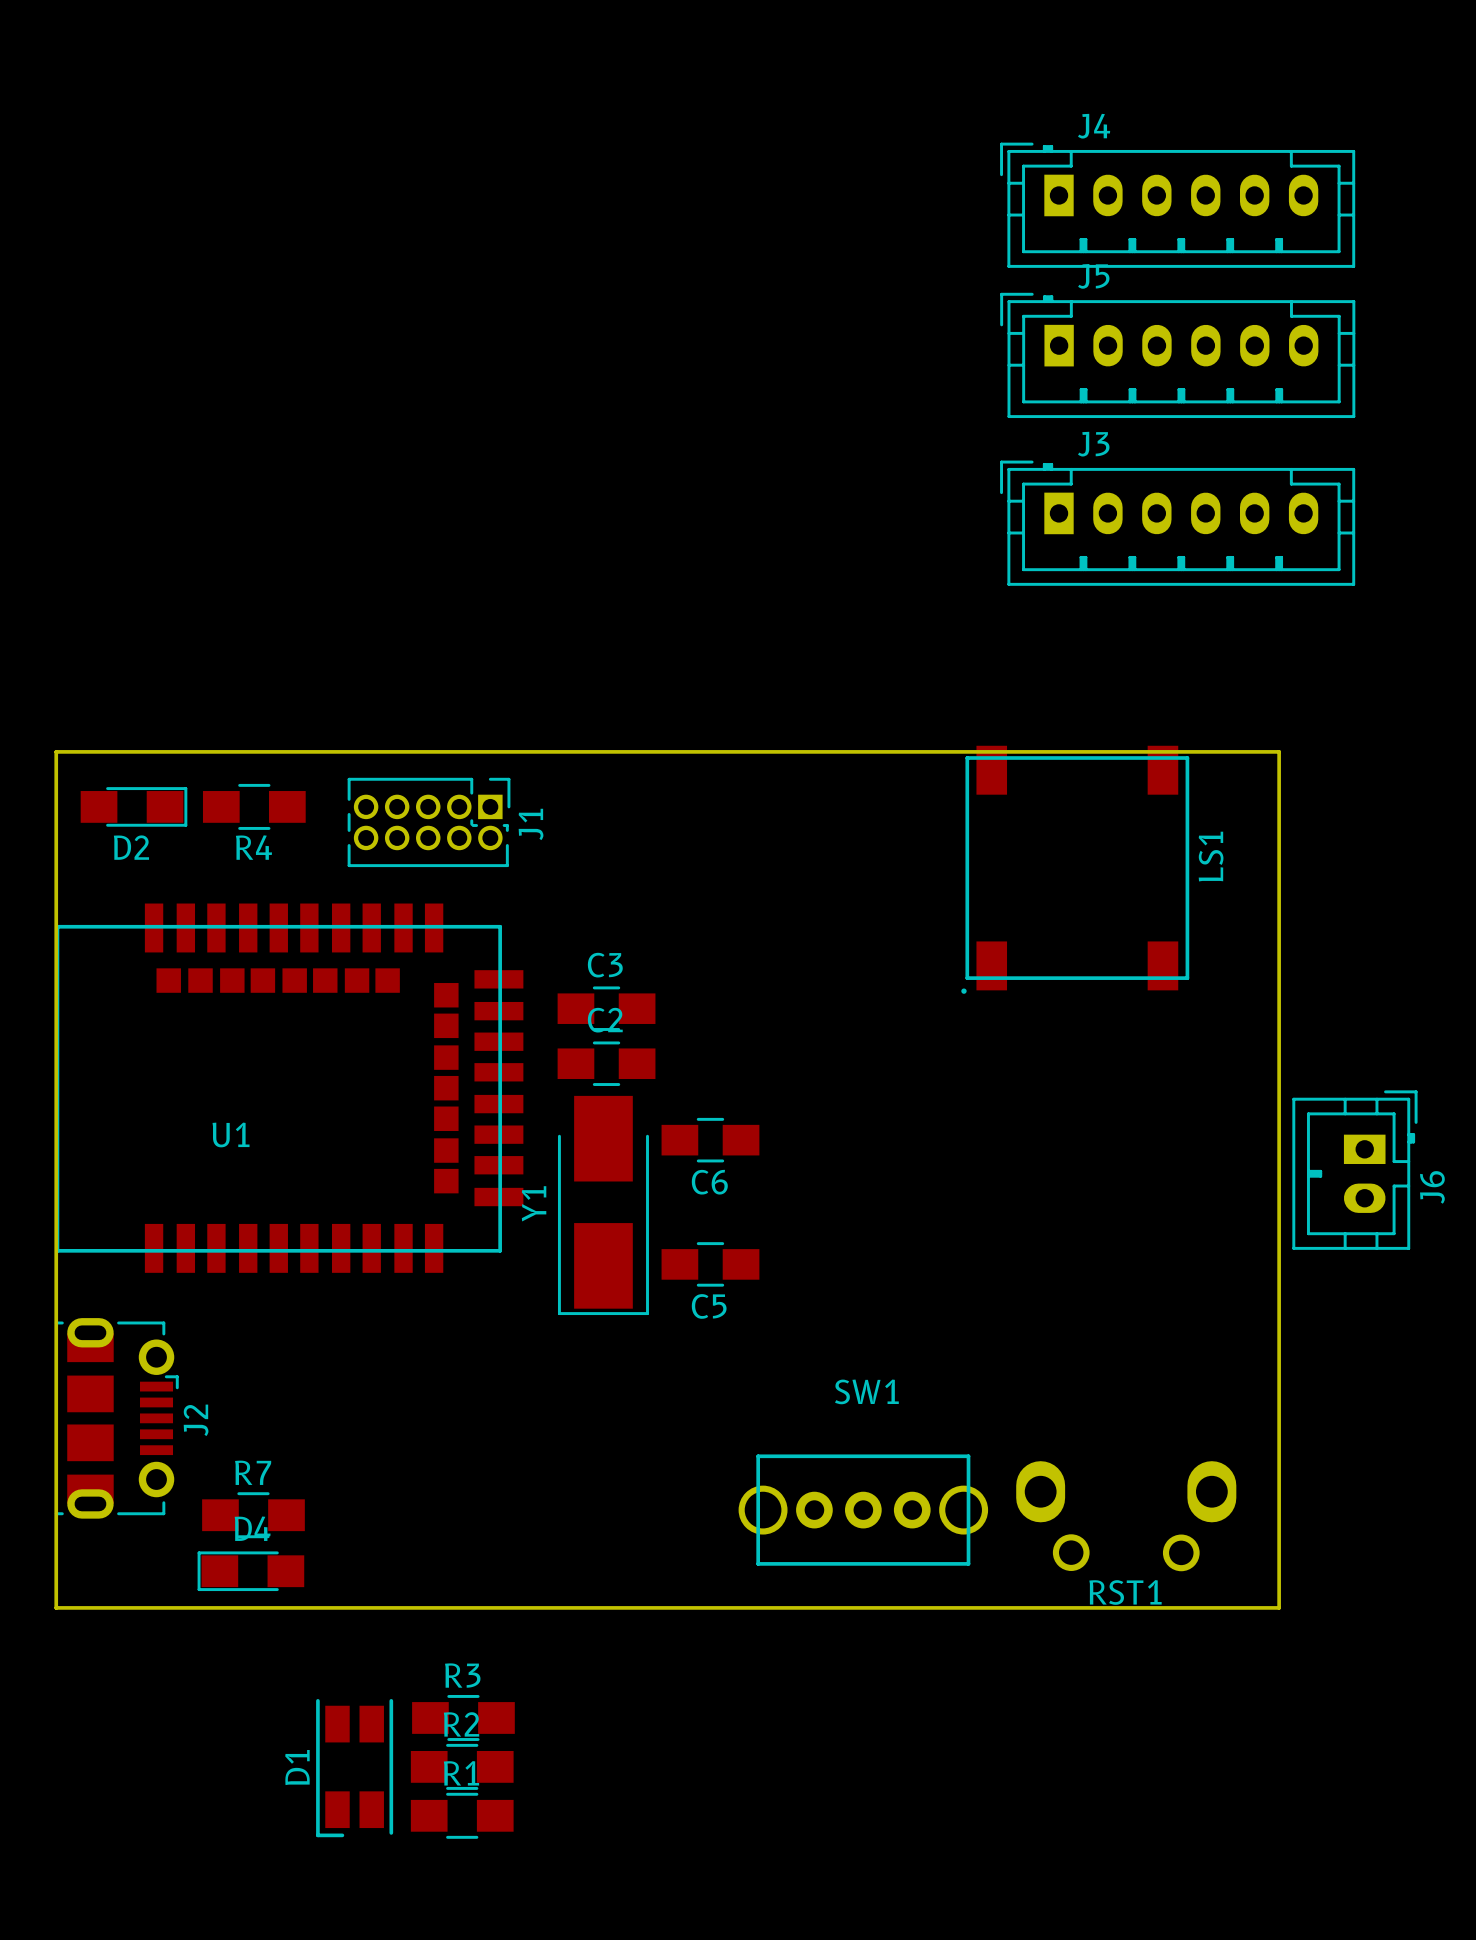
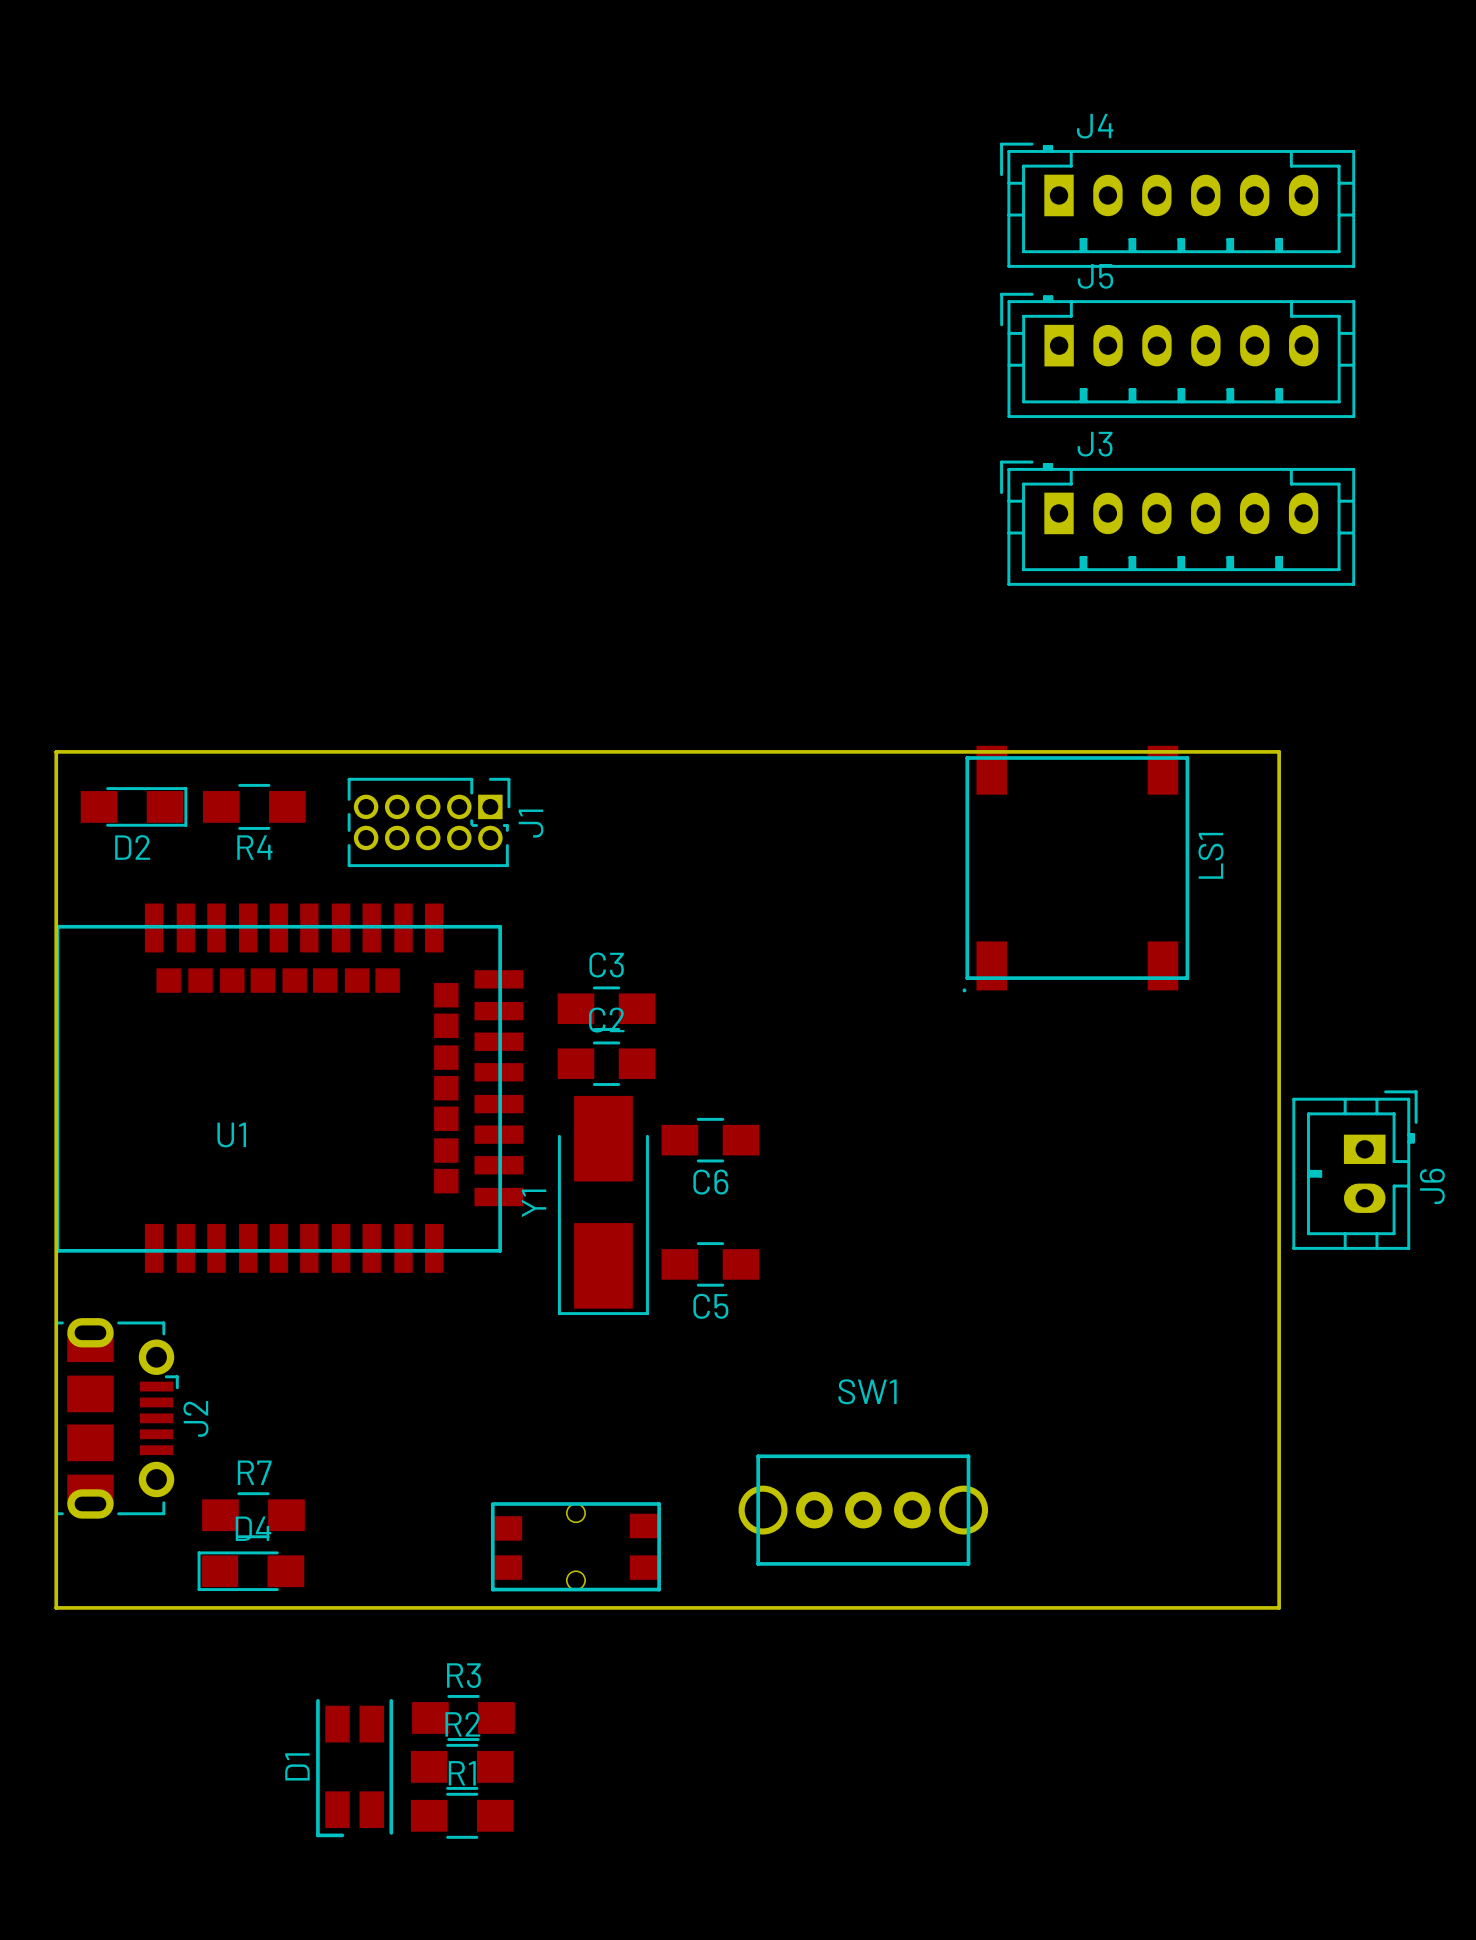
RST1: (1126, 1516) -> none
part: none -> (575, 1546)

